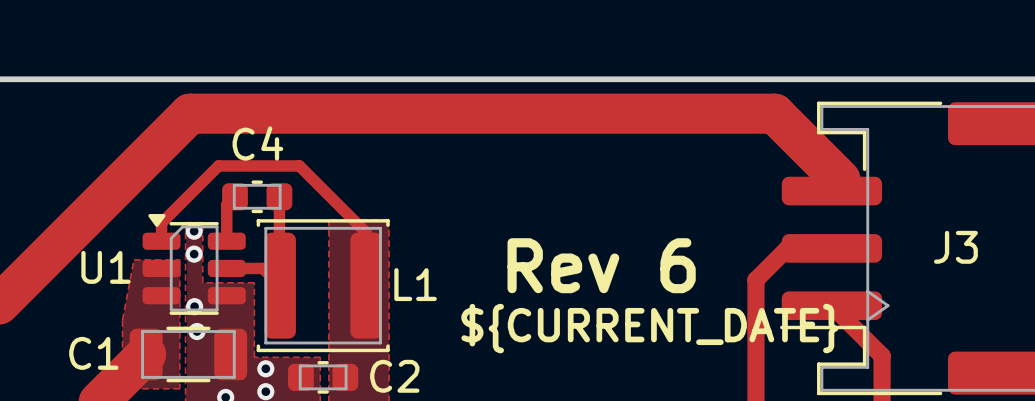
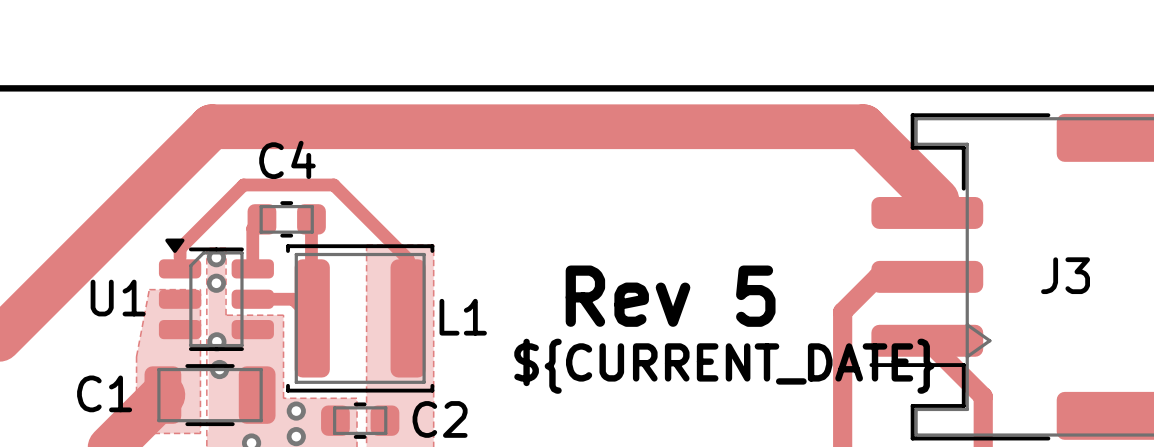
text: Rev 6 (601, 265) -> Rev 5 (670, 296)

